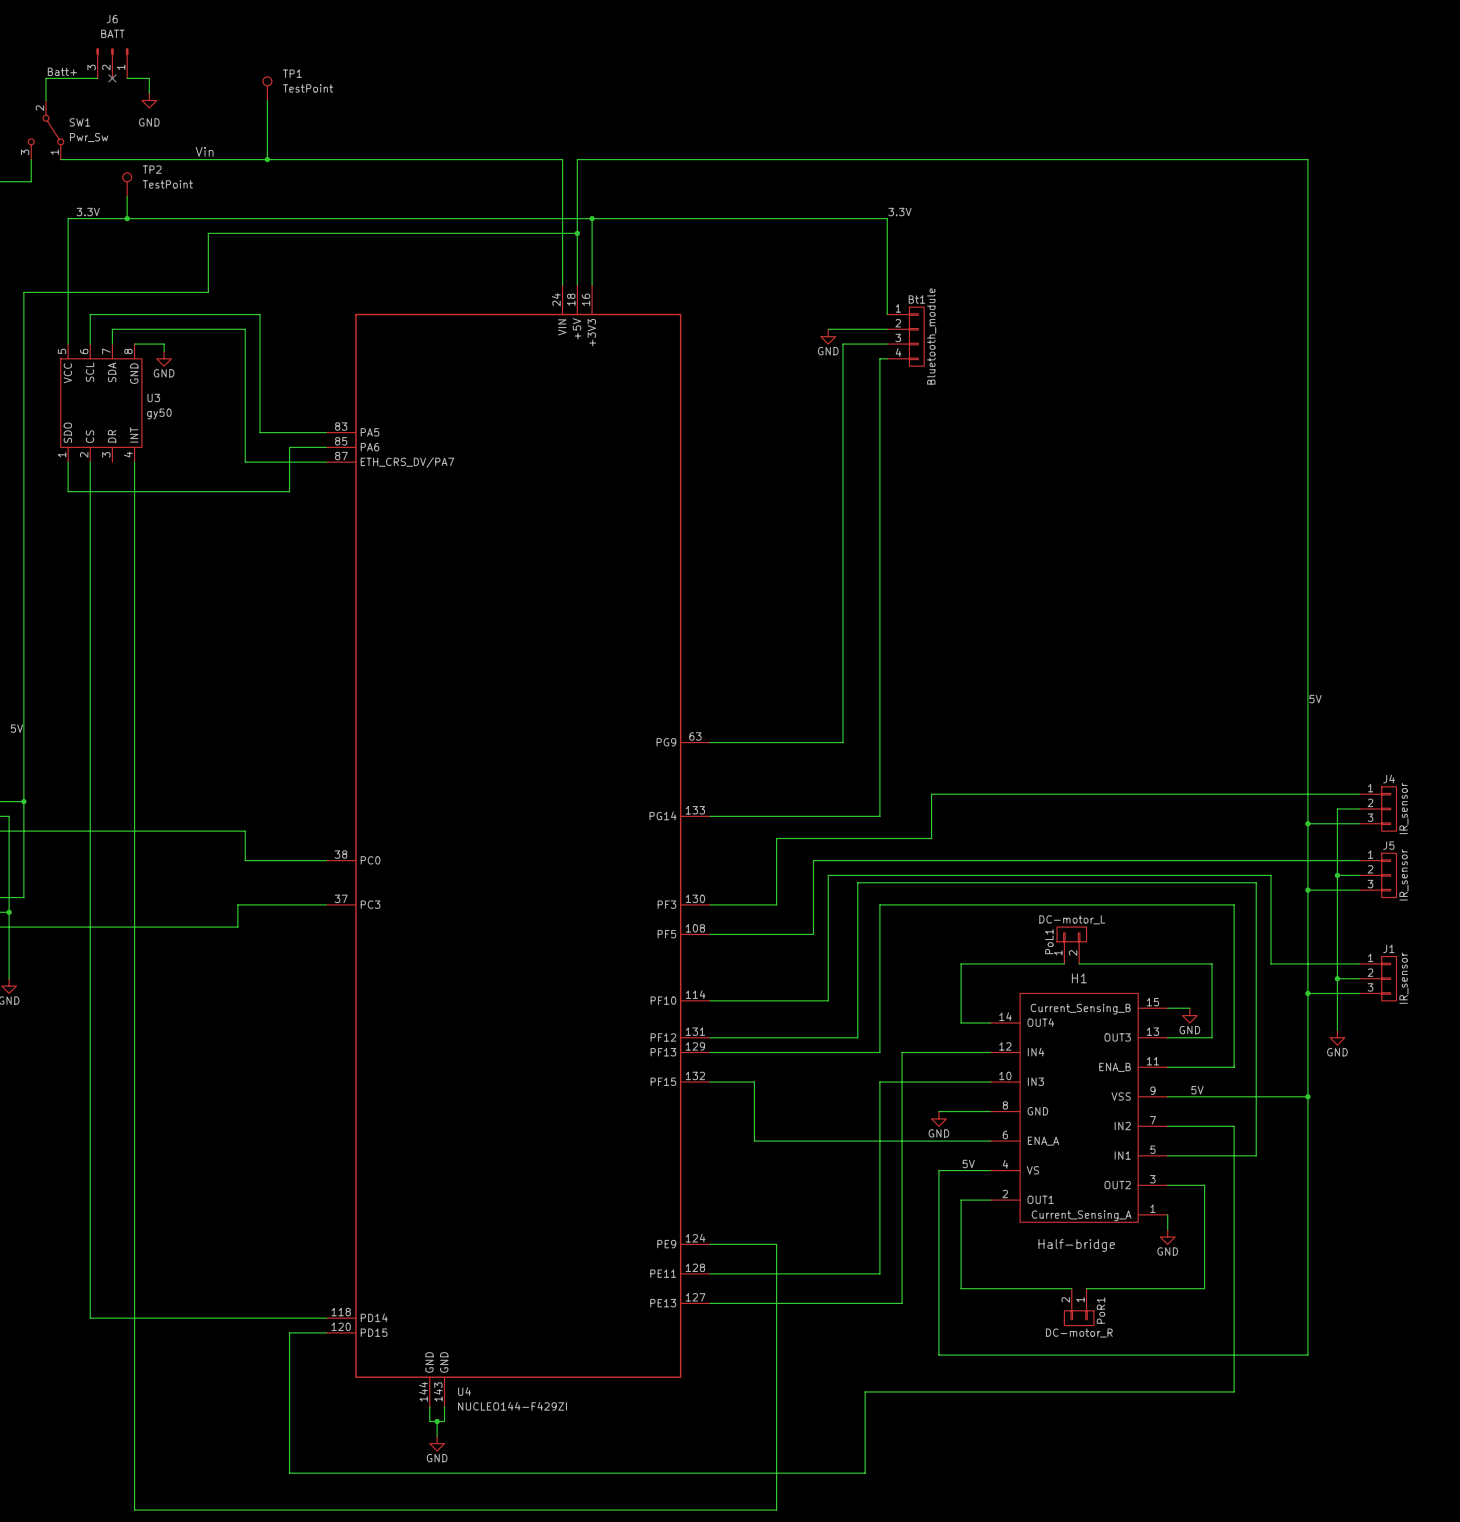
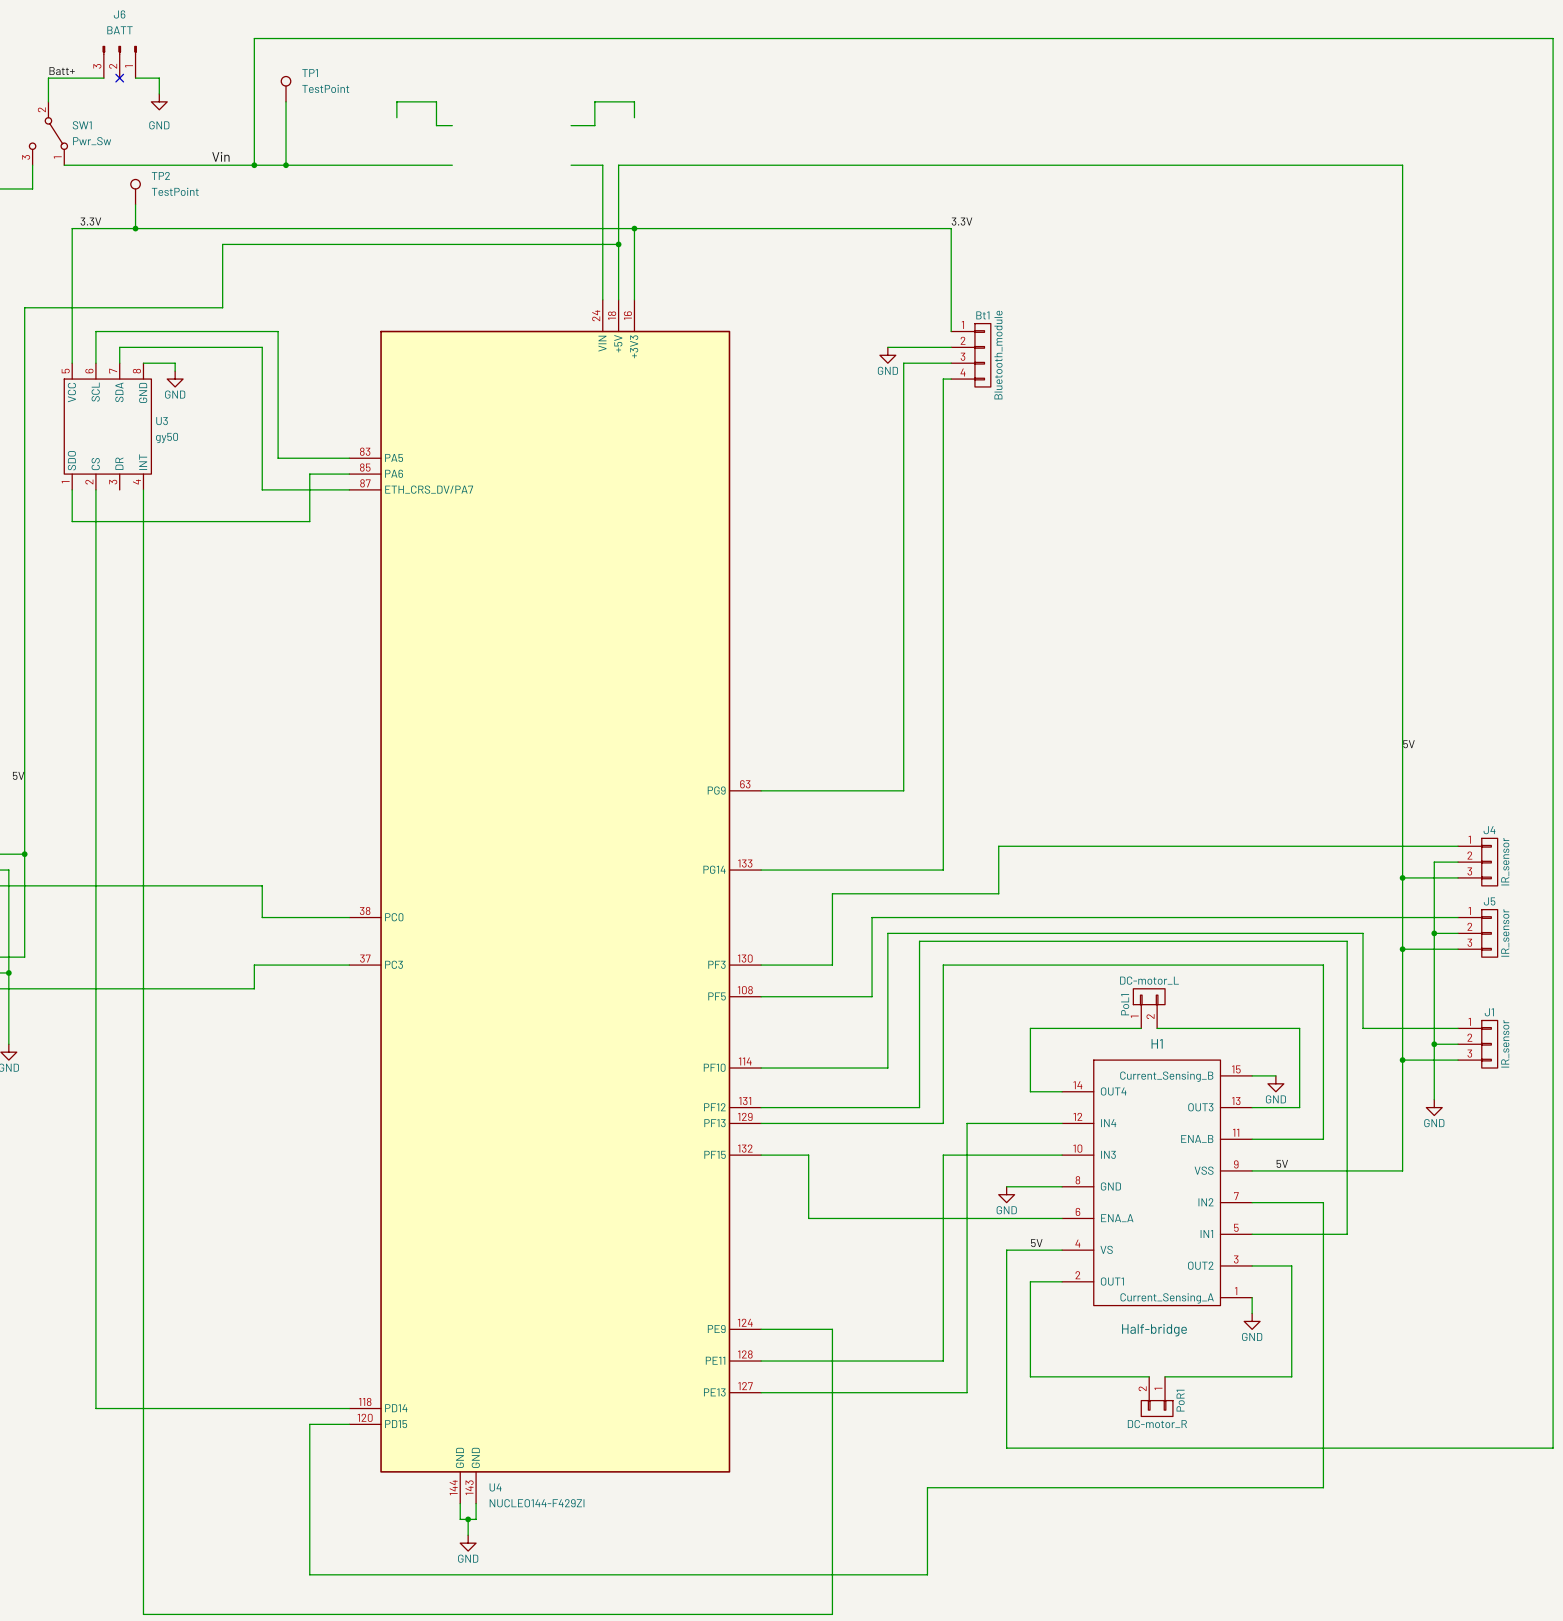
wire: none -> (396, 117) (396, 101) (436, 101) (436, 125) (452, 125)
wire: none -> (634, 117) (634, 101) (594, 101) (594, 125) (571, 125)
junction: none -> (254, 165)
wire: (422, 159) (533, 159) -> none
wire: (1307, 1096) (1307, 1355) -> (254, 165) (254, 38) (1553, 38) (1553, 1448) (1402, 1448)
junction: (1307, 1096) -> none

